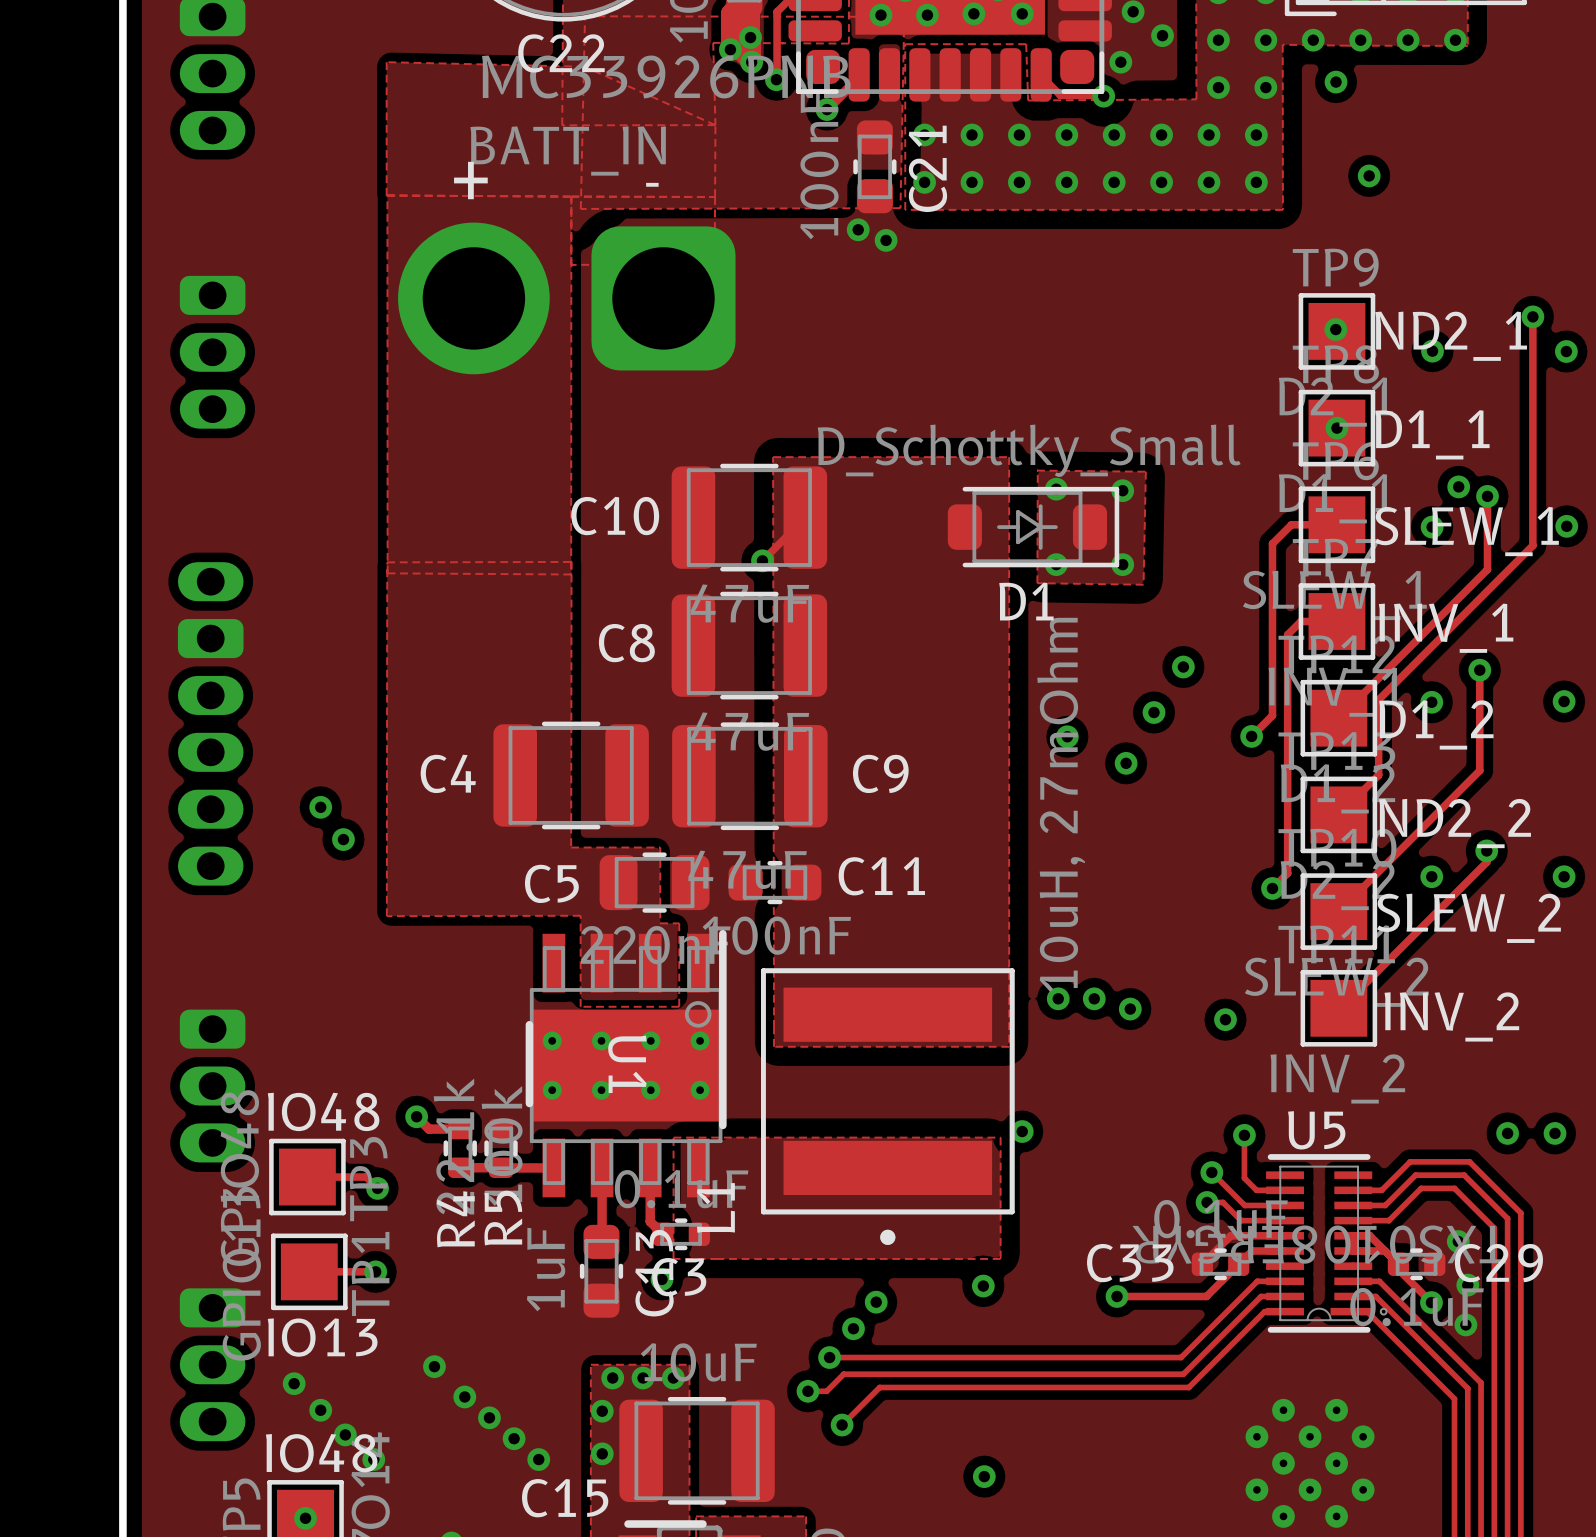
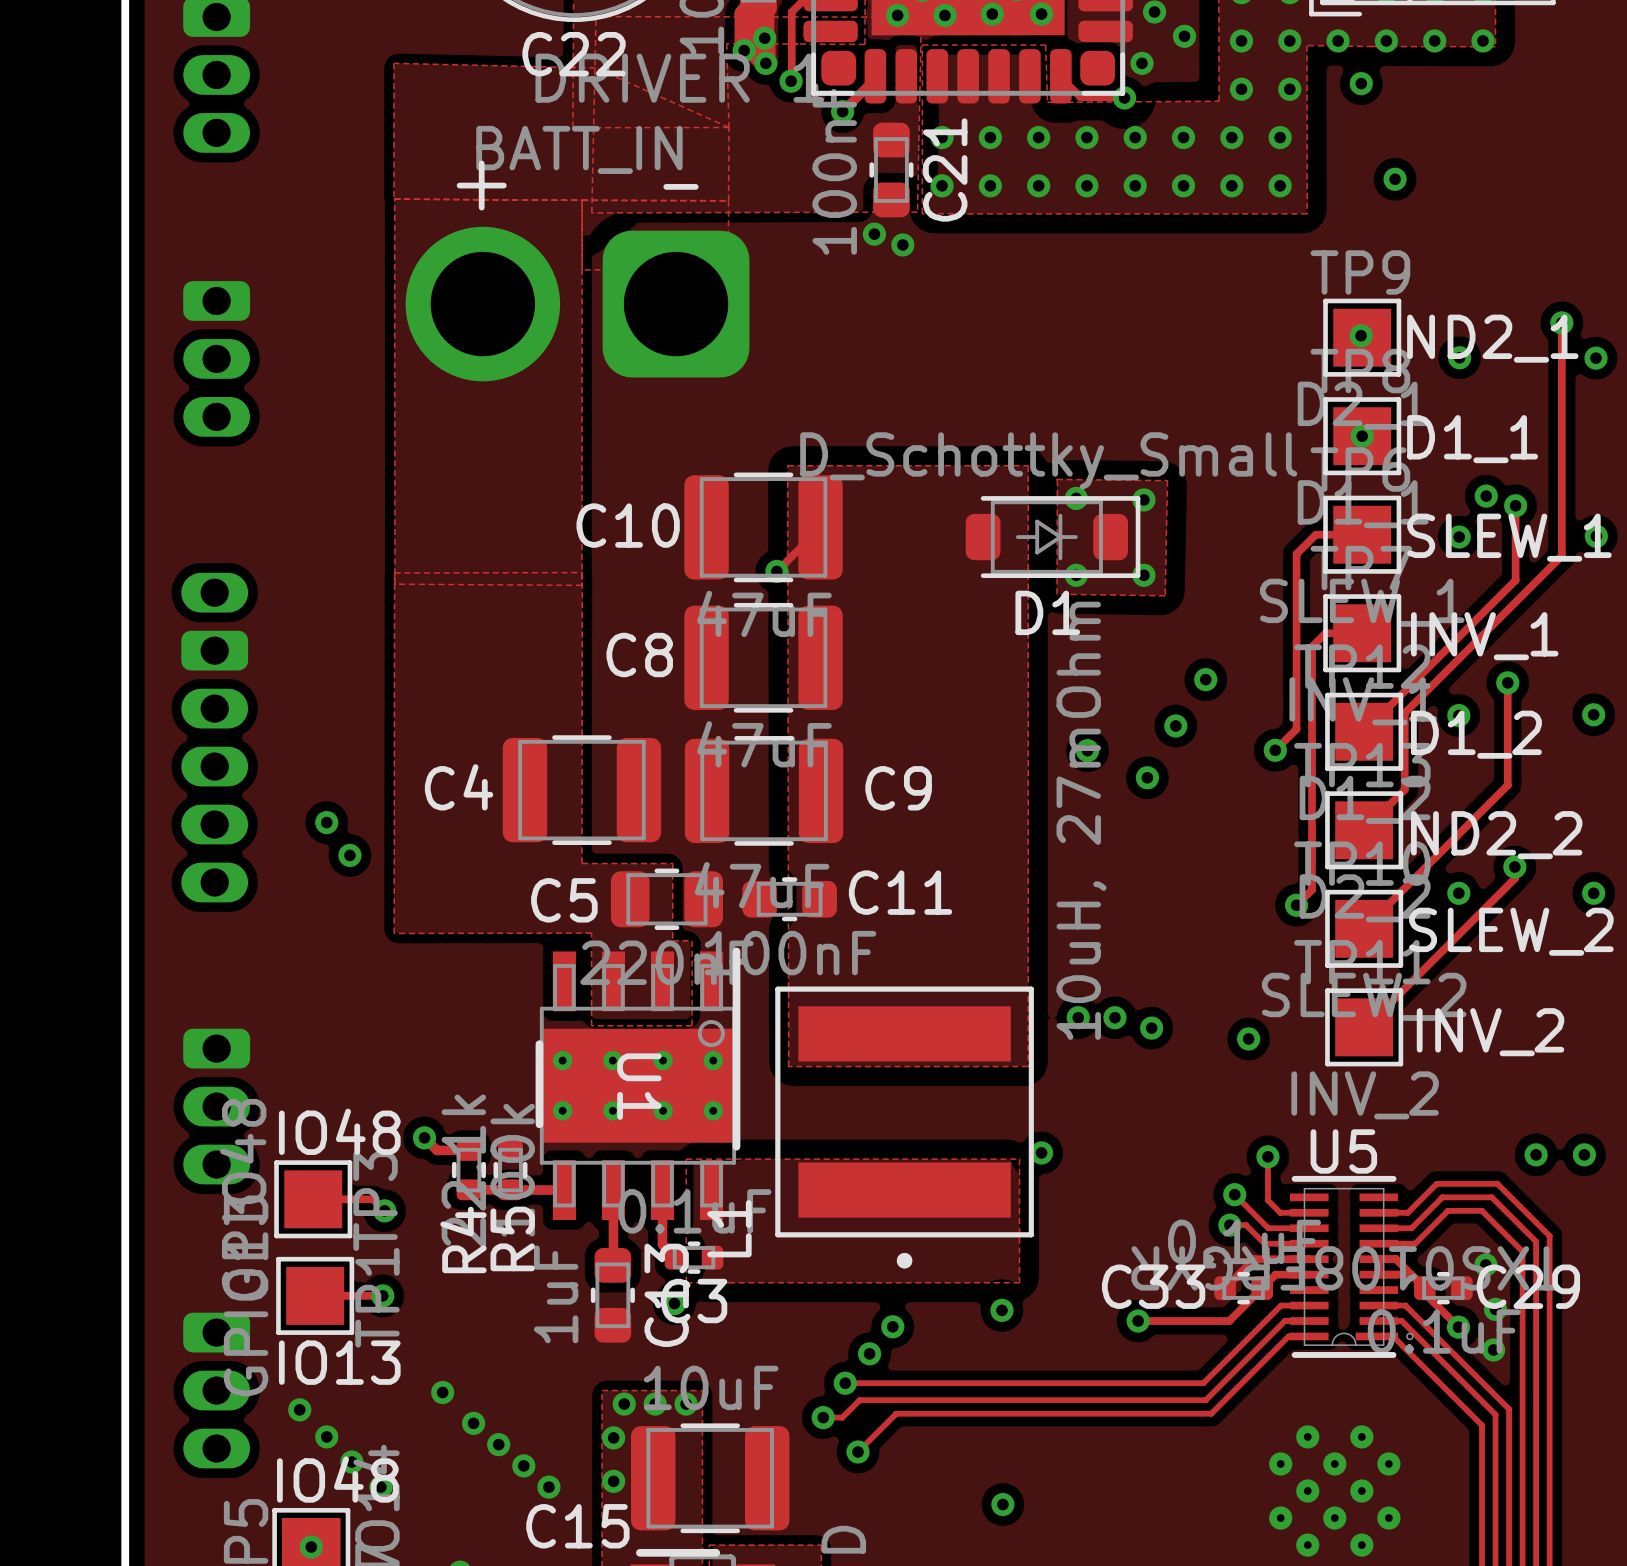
part value: MC33926PNB (666, 76) -> DRIVER 1 (679, 78)

